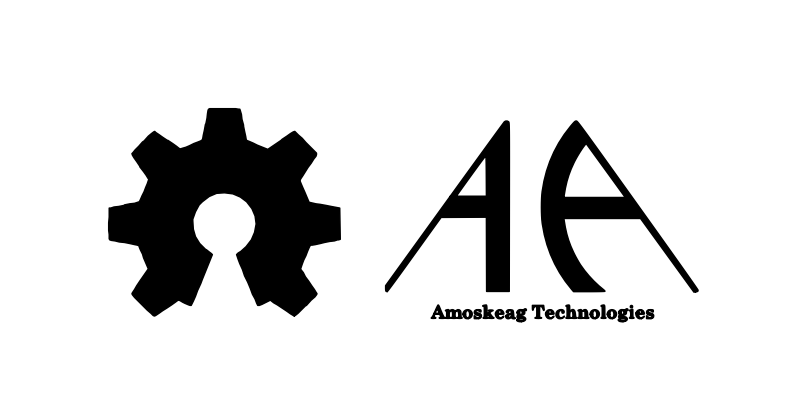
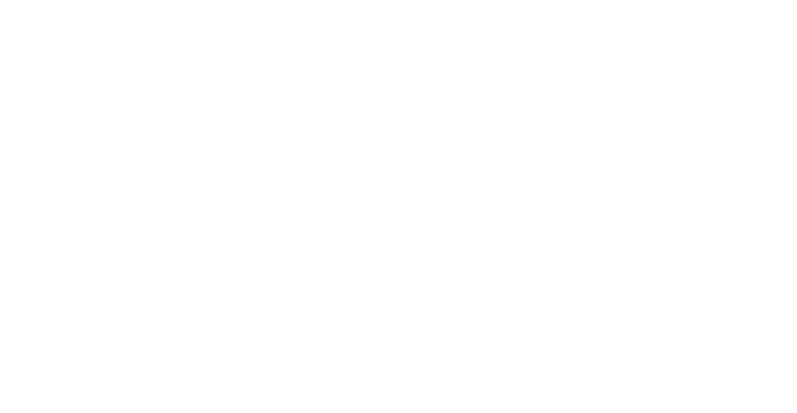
power symbol: (224, 212) -> none
power symbol: (541, 221) -> none

